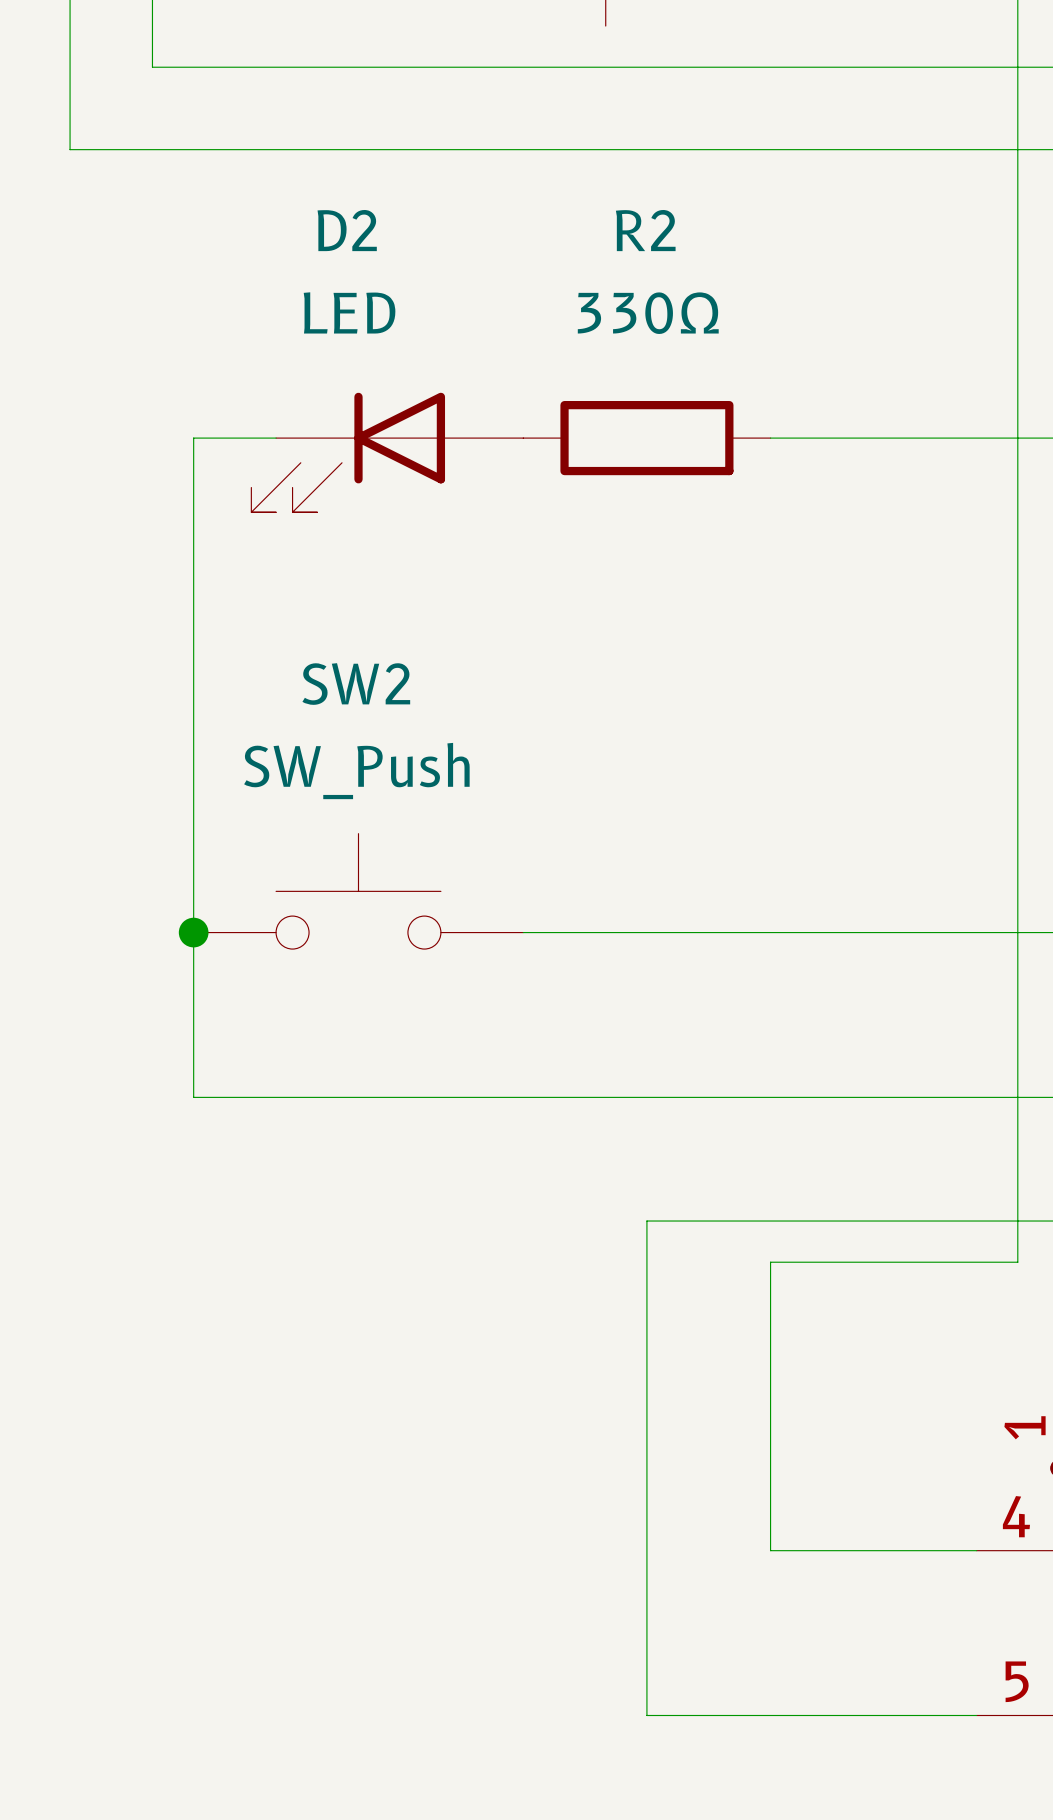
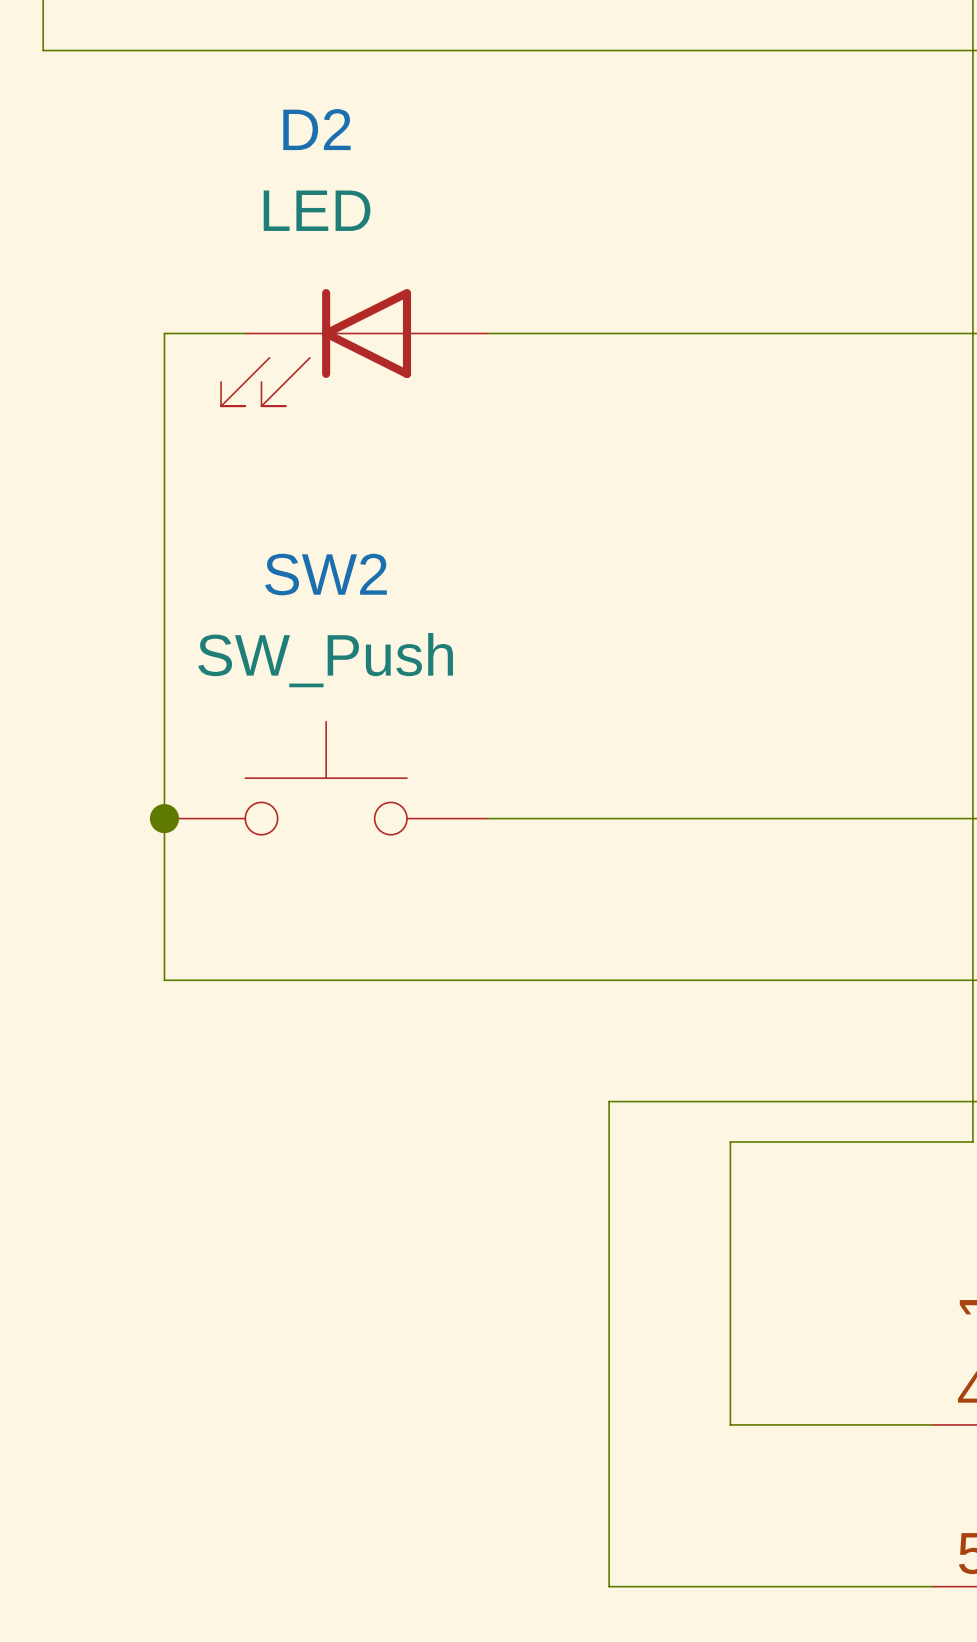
wire: none -> (487, 333) (730, 333)
R2: 330Ω (646, 438) -> none

